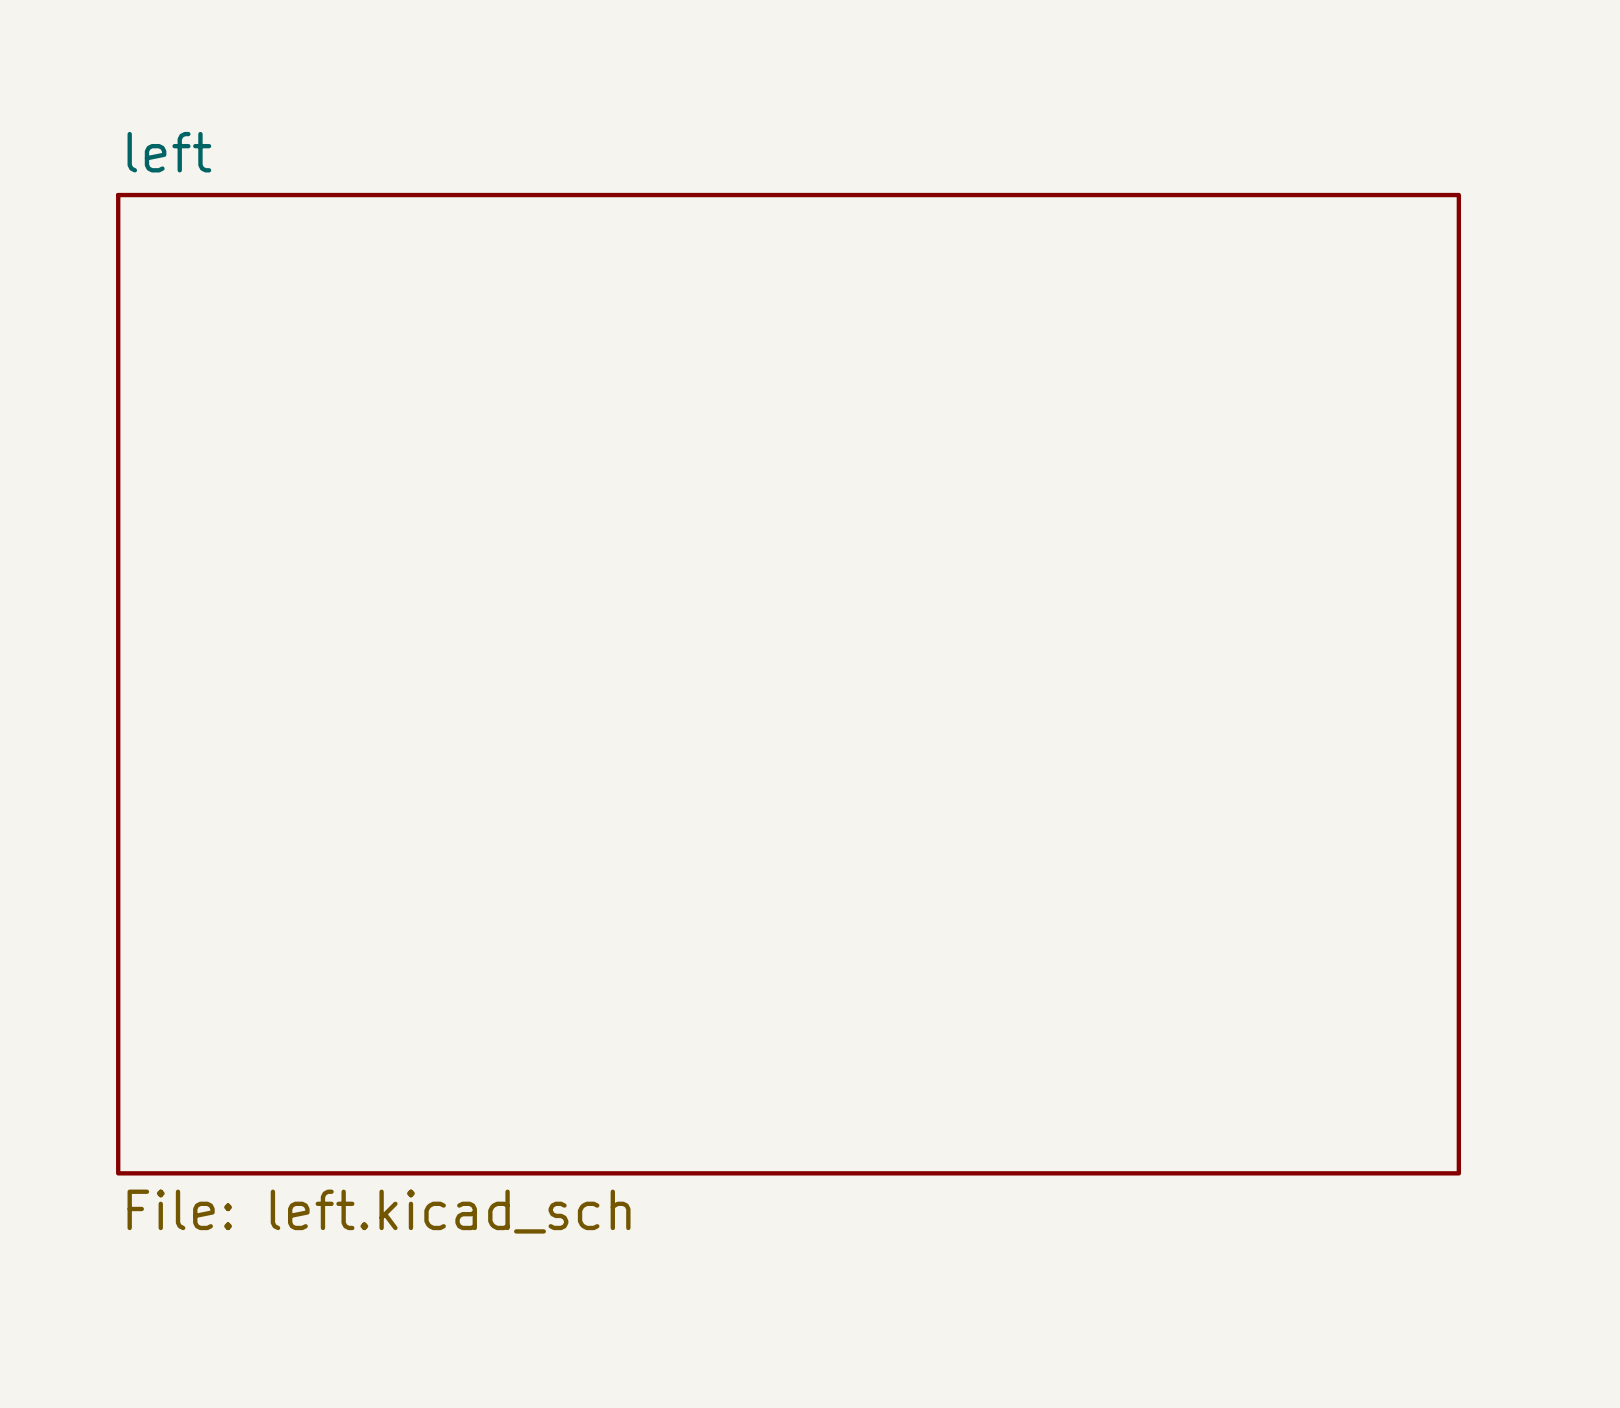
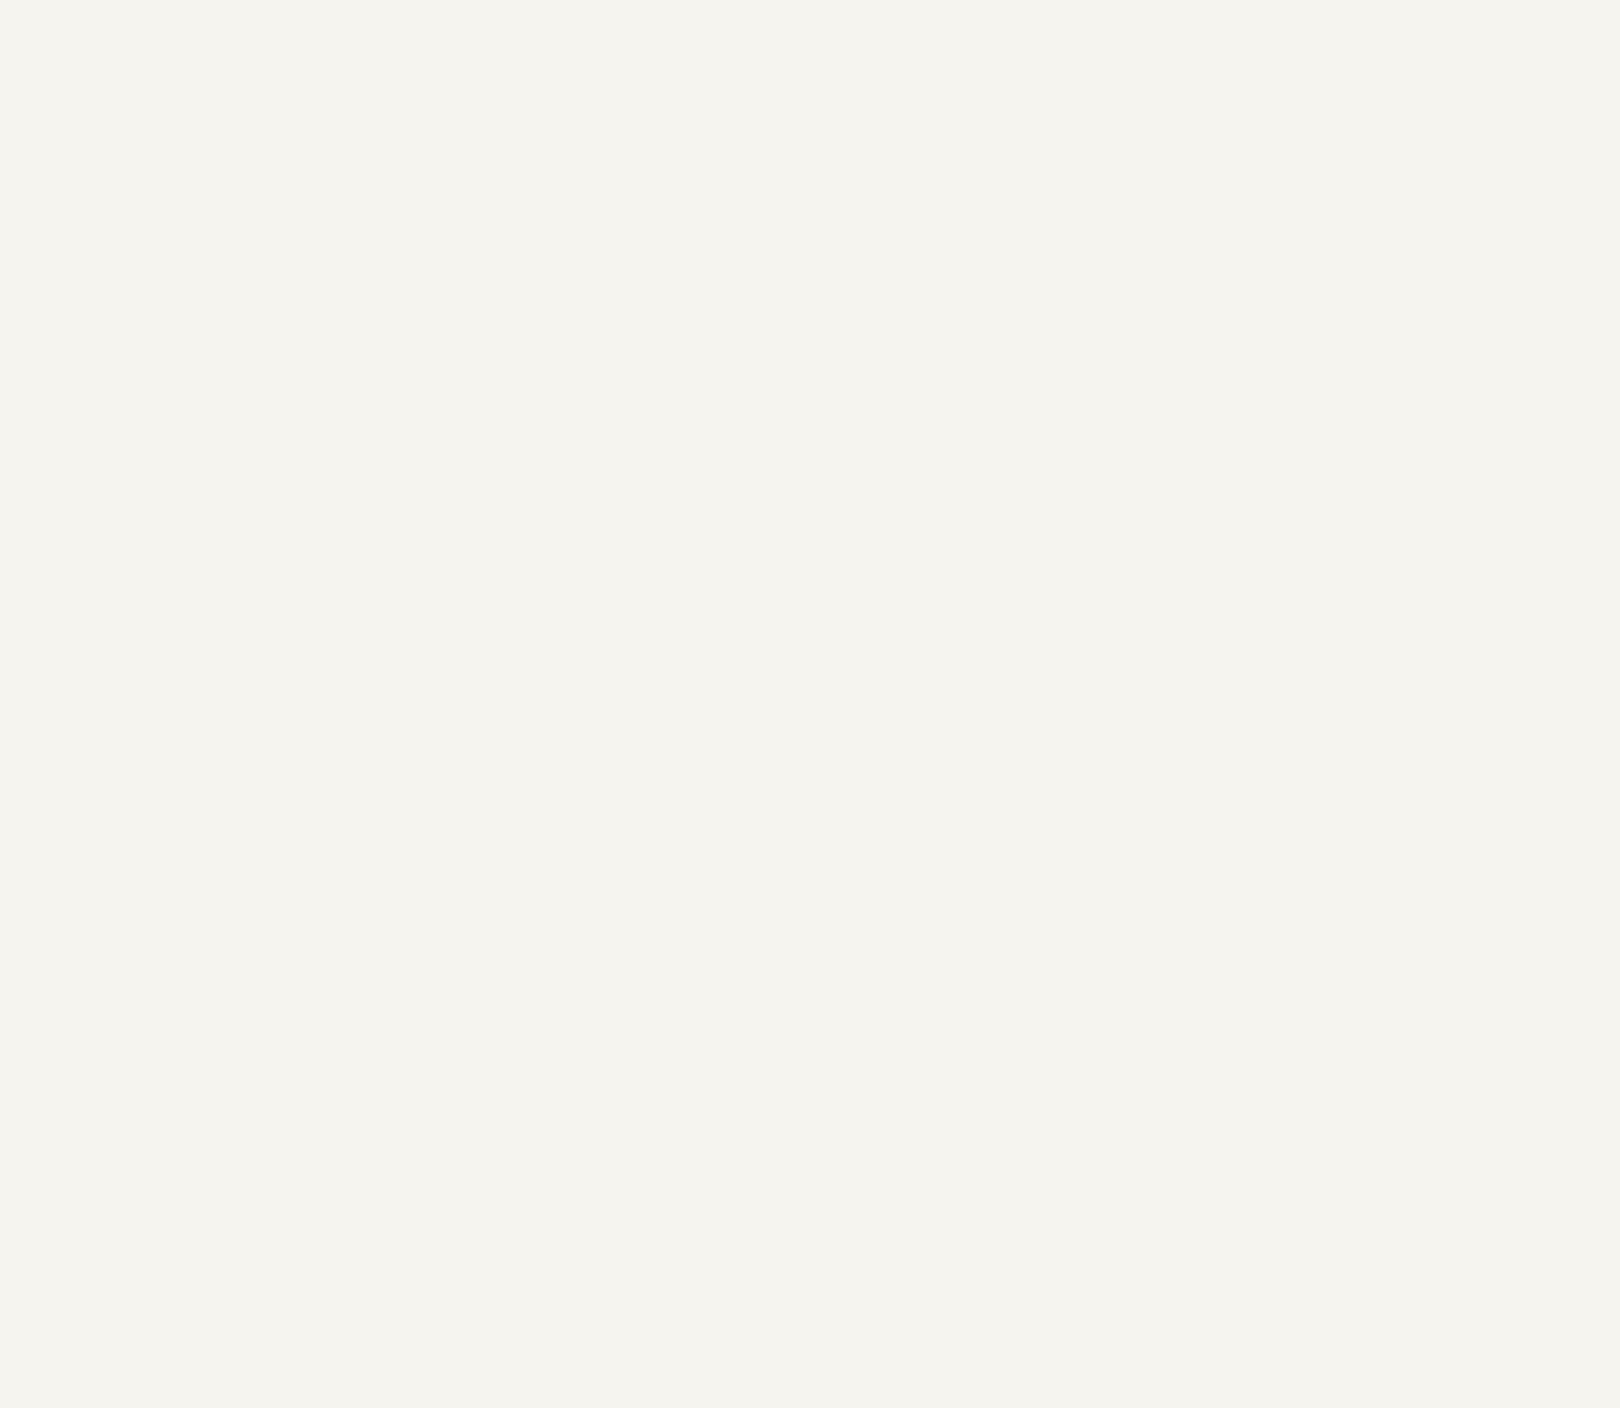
sheet left: File: left.kicad_sch (788, 684) -> none

